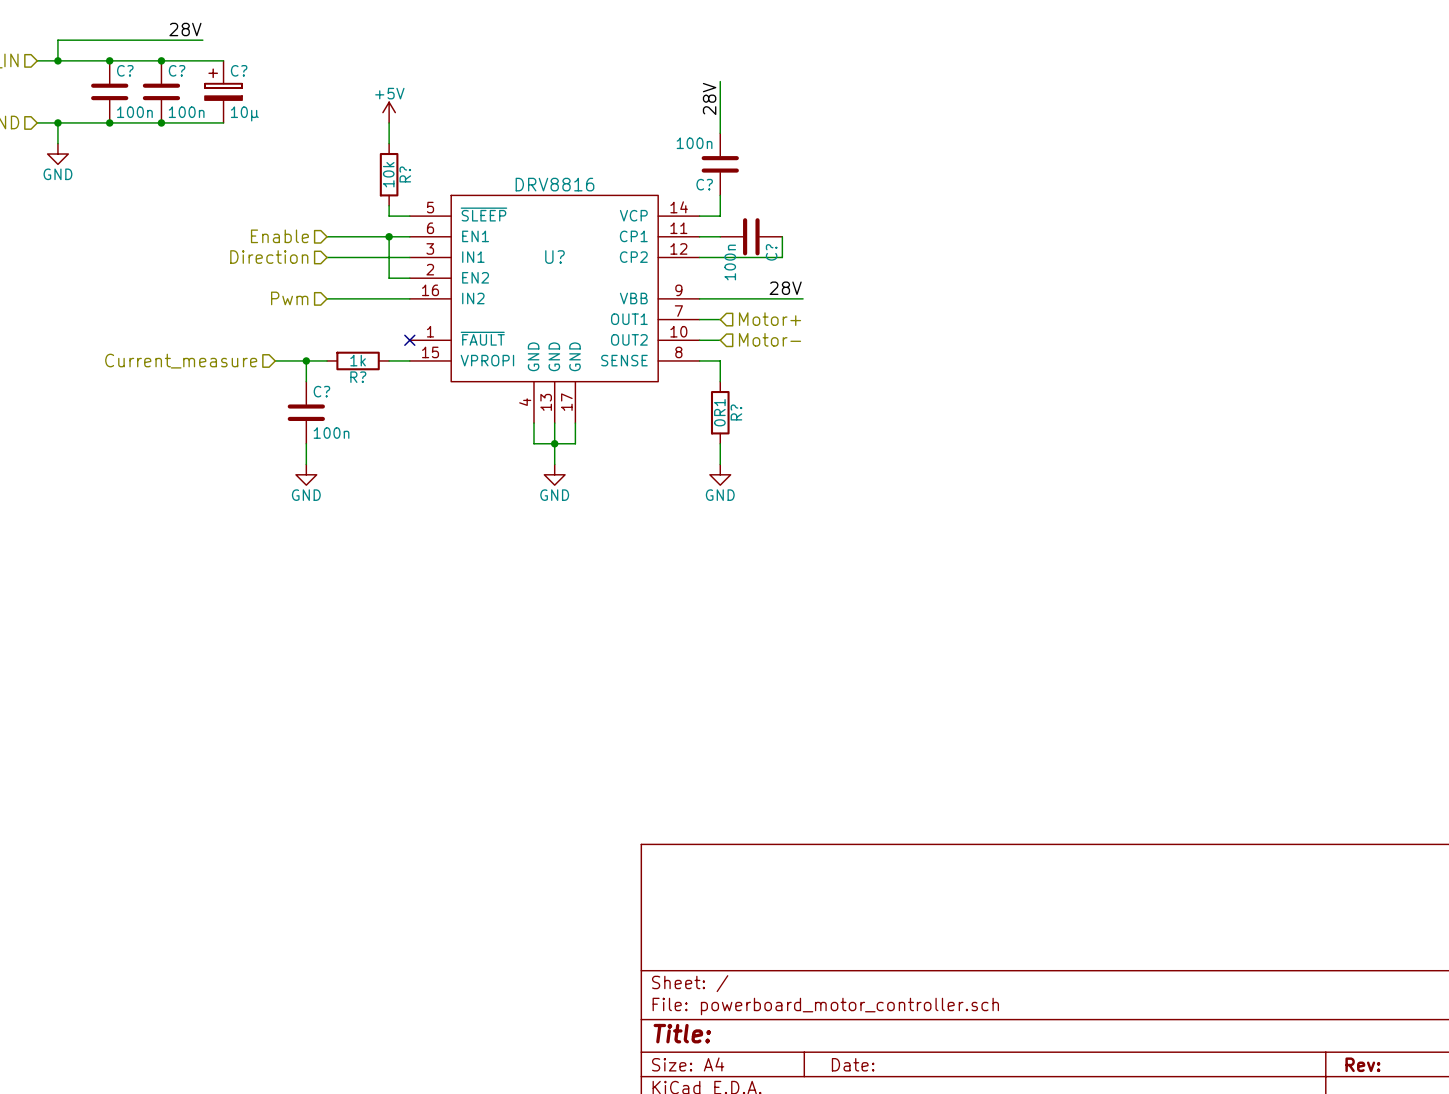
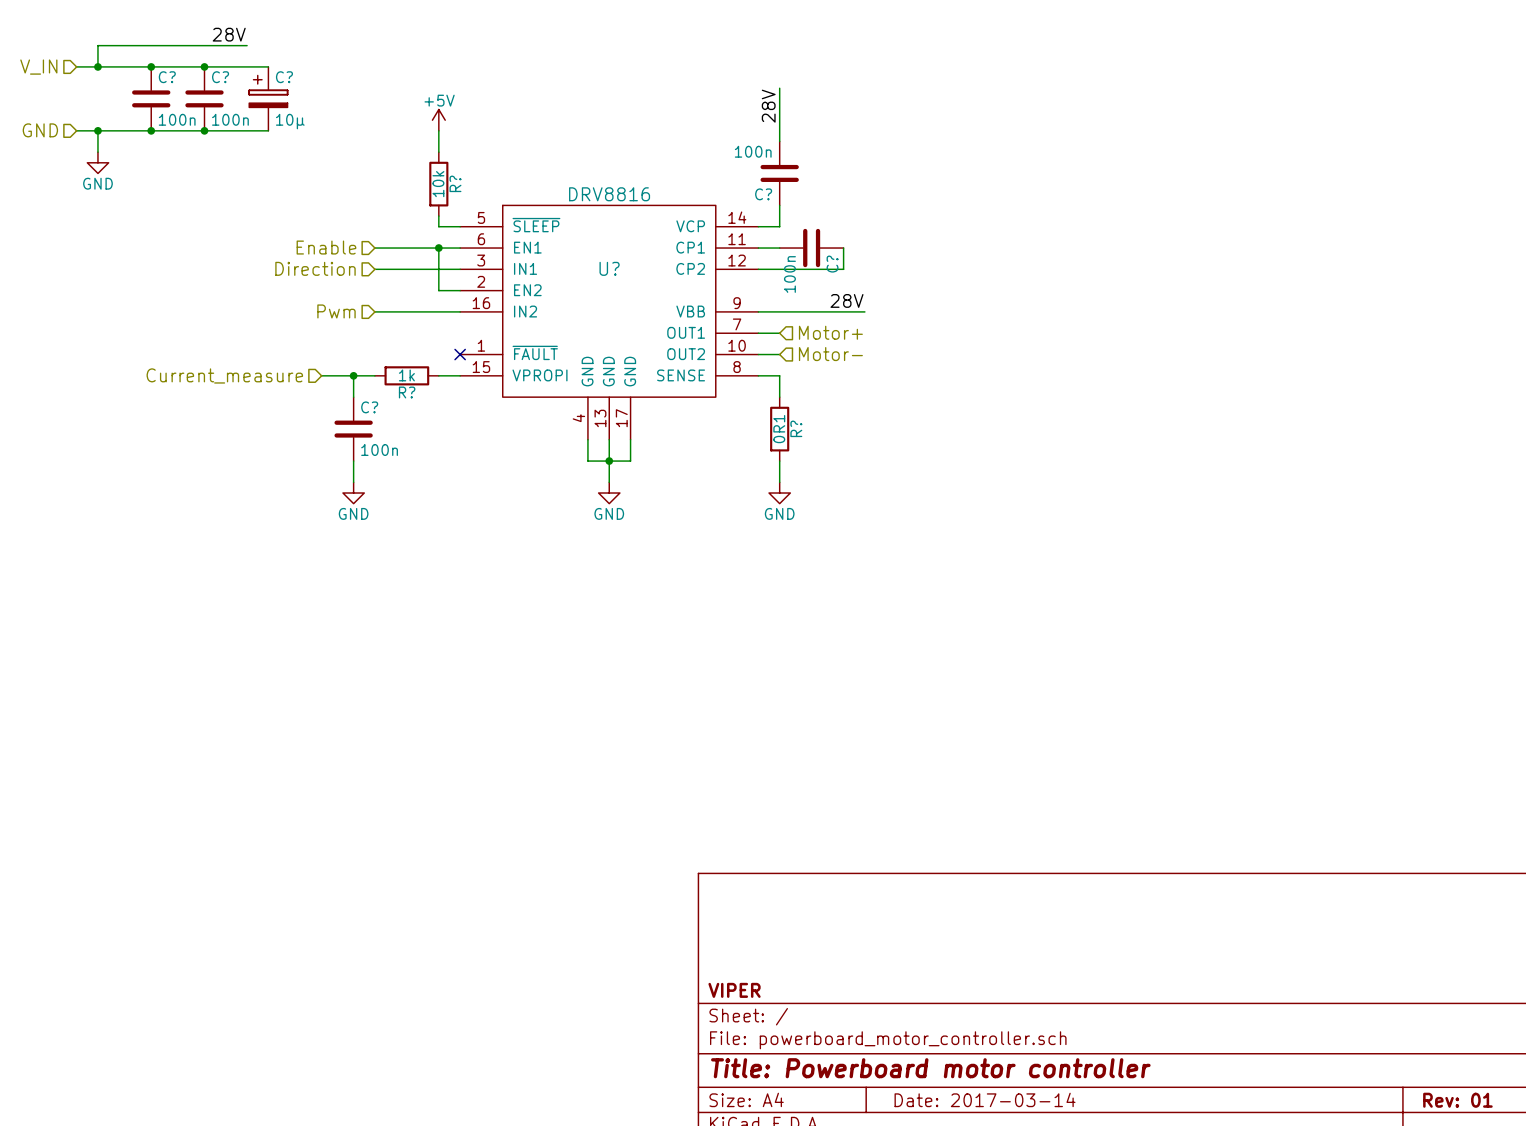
title block: none -> VIPER (734, 990)
title block: Title: (682, 1033) -> Title: Powerboard motor controller (930, 1068)
title block: Date: (853, 1064) -> Date: 2017-03-14 (985, 1099)
title block: Rev: (1362, 1064) -> Rev: 01 (1457, 1100)

